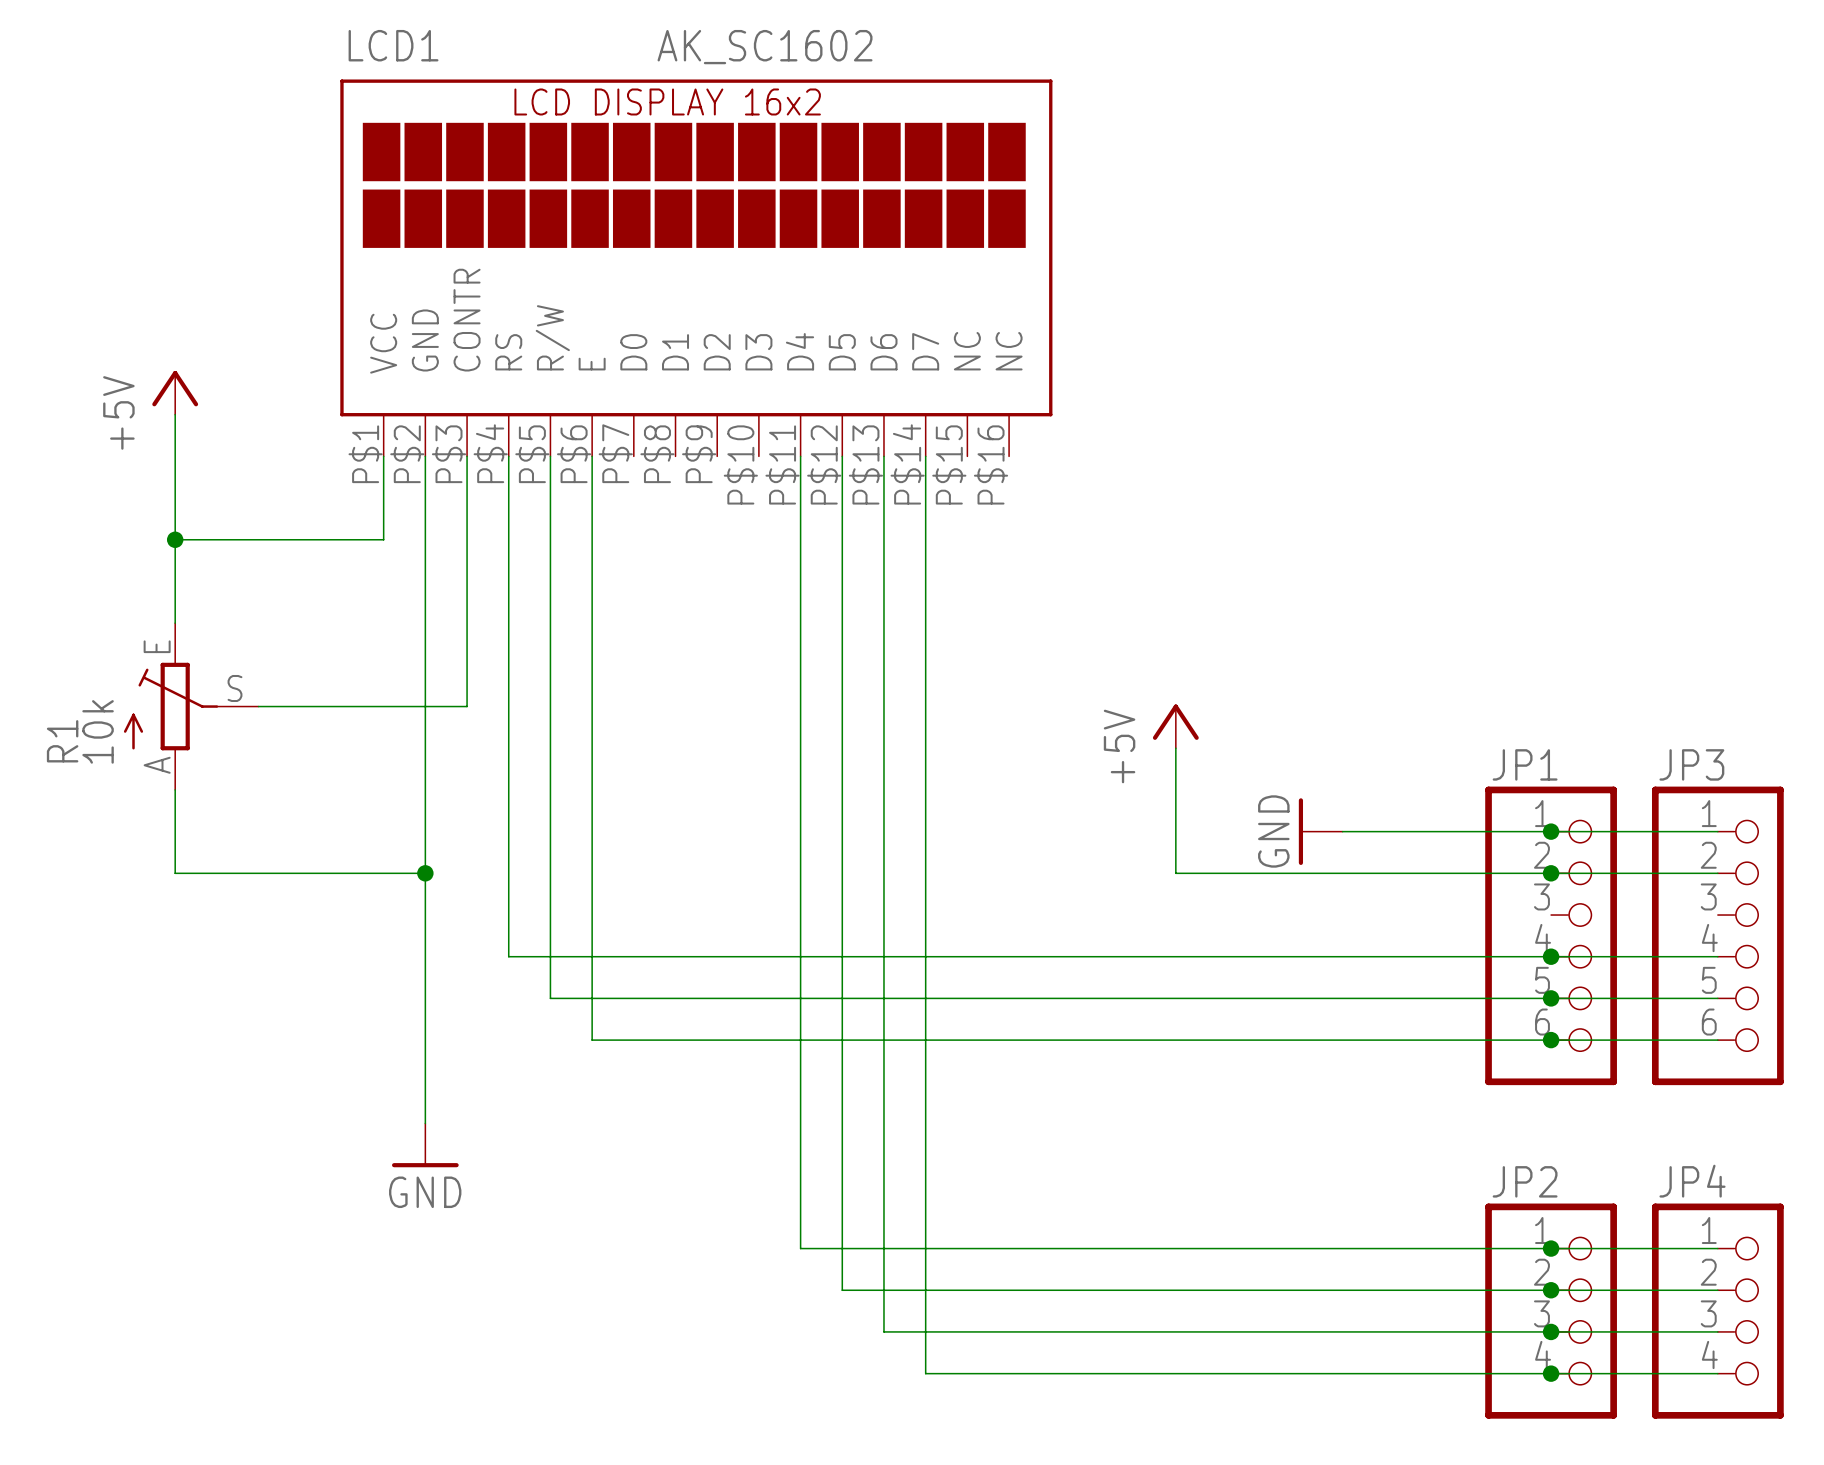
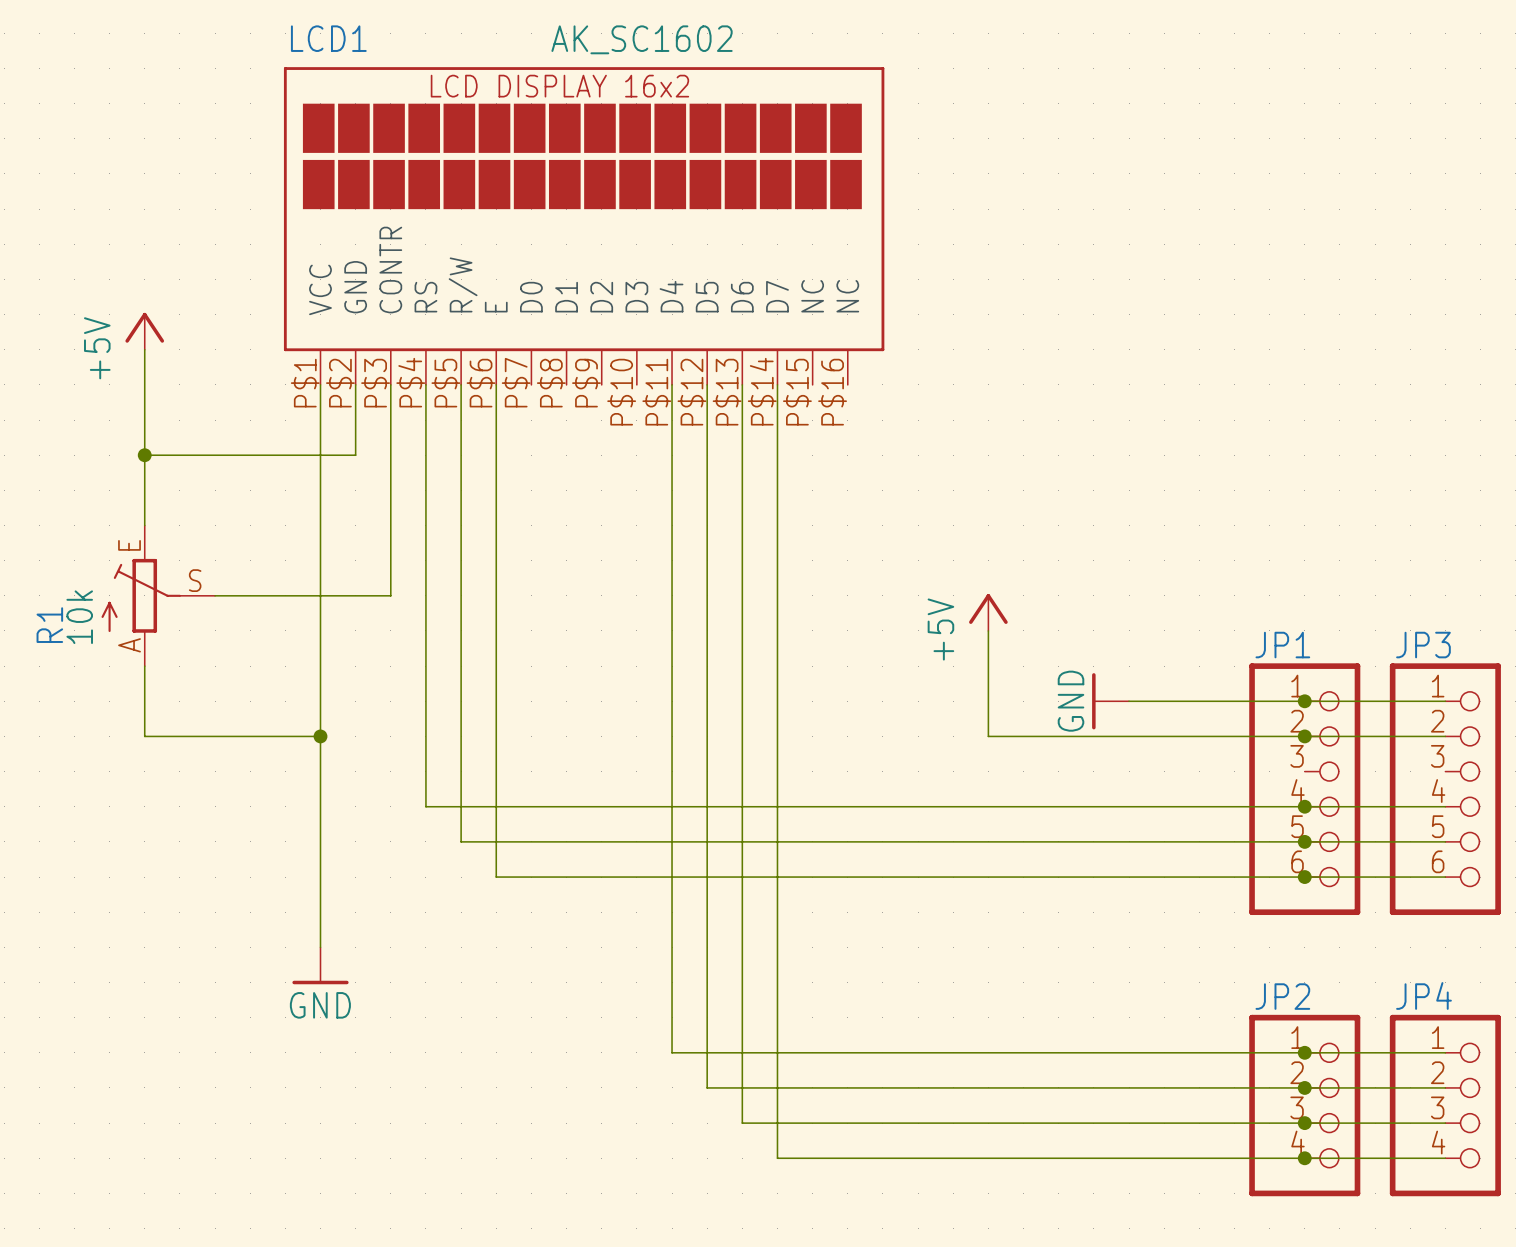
wire: (425, 539) (425, 1123) -> (355, 455) (320, 455) (320, 947)
wire: (383, 873) (425, 873) -> none
junction position: (425, 873) -> (320, 736)
power symbol position: GND (425, 1145) -> GND (320, 965)

